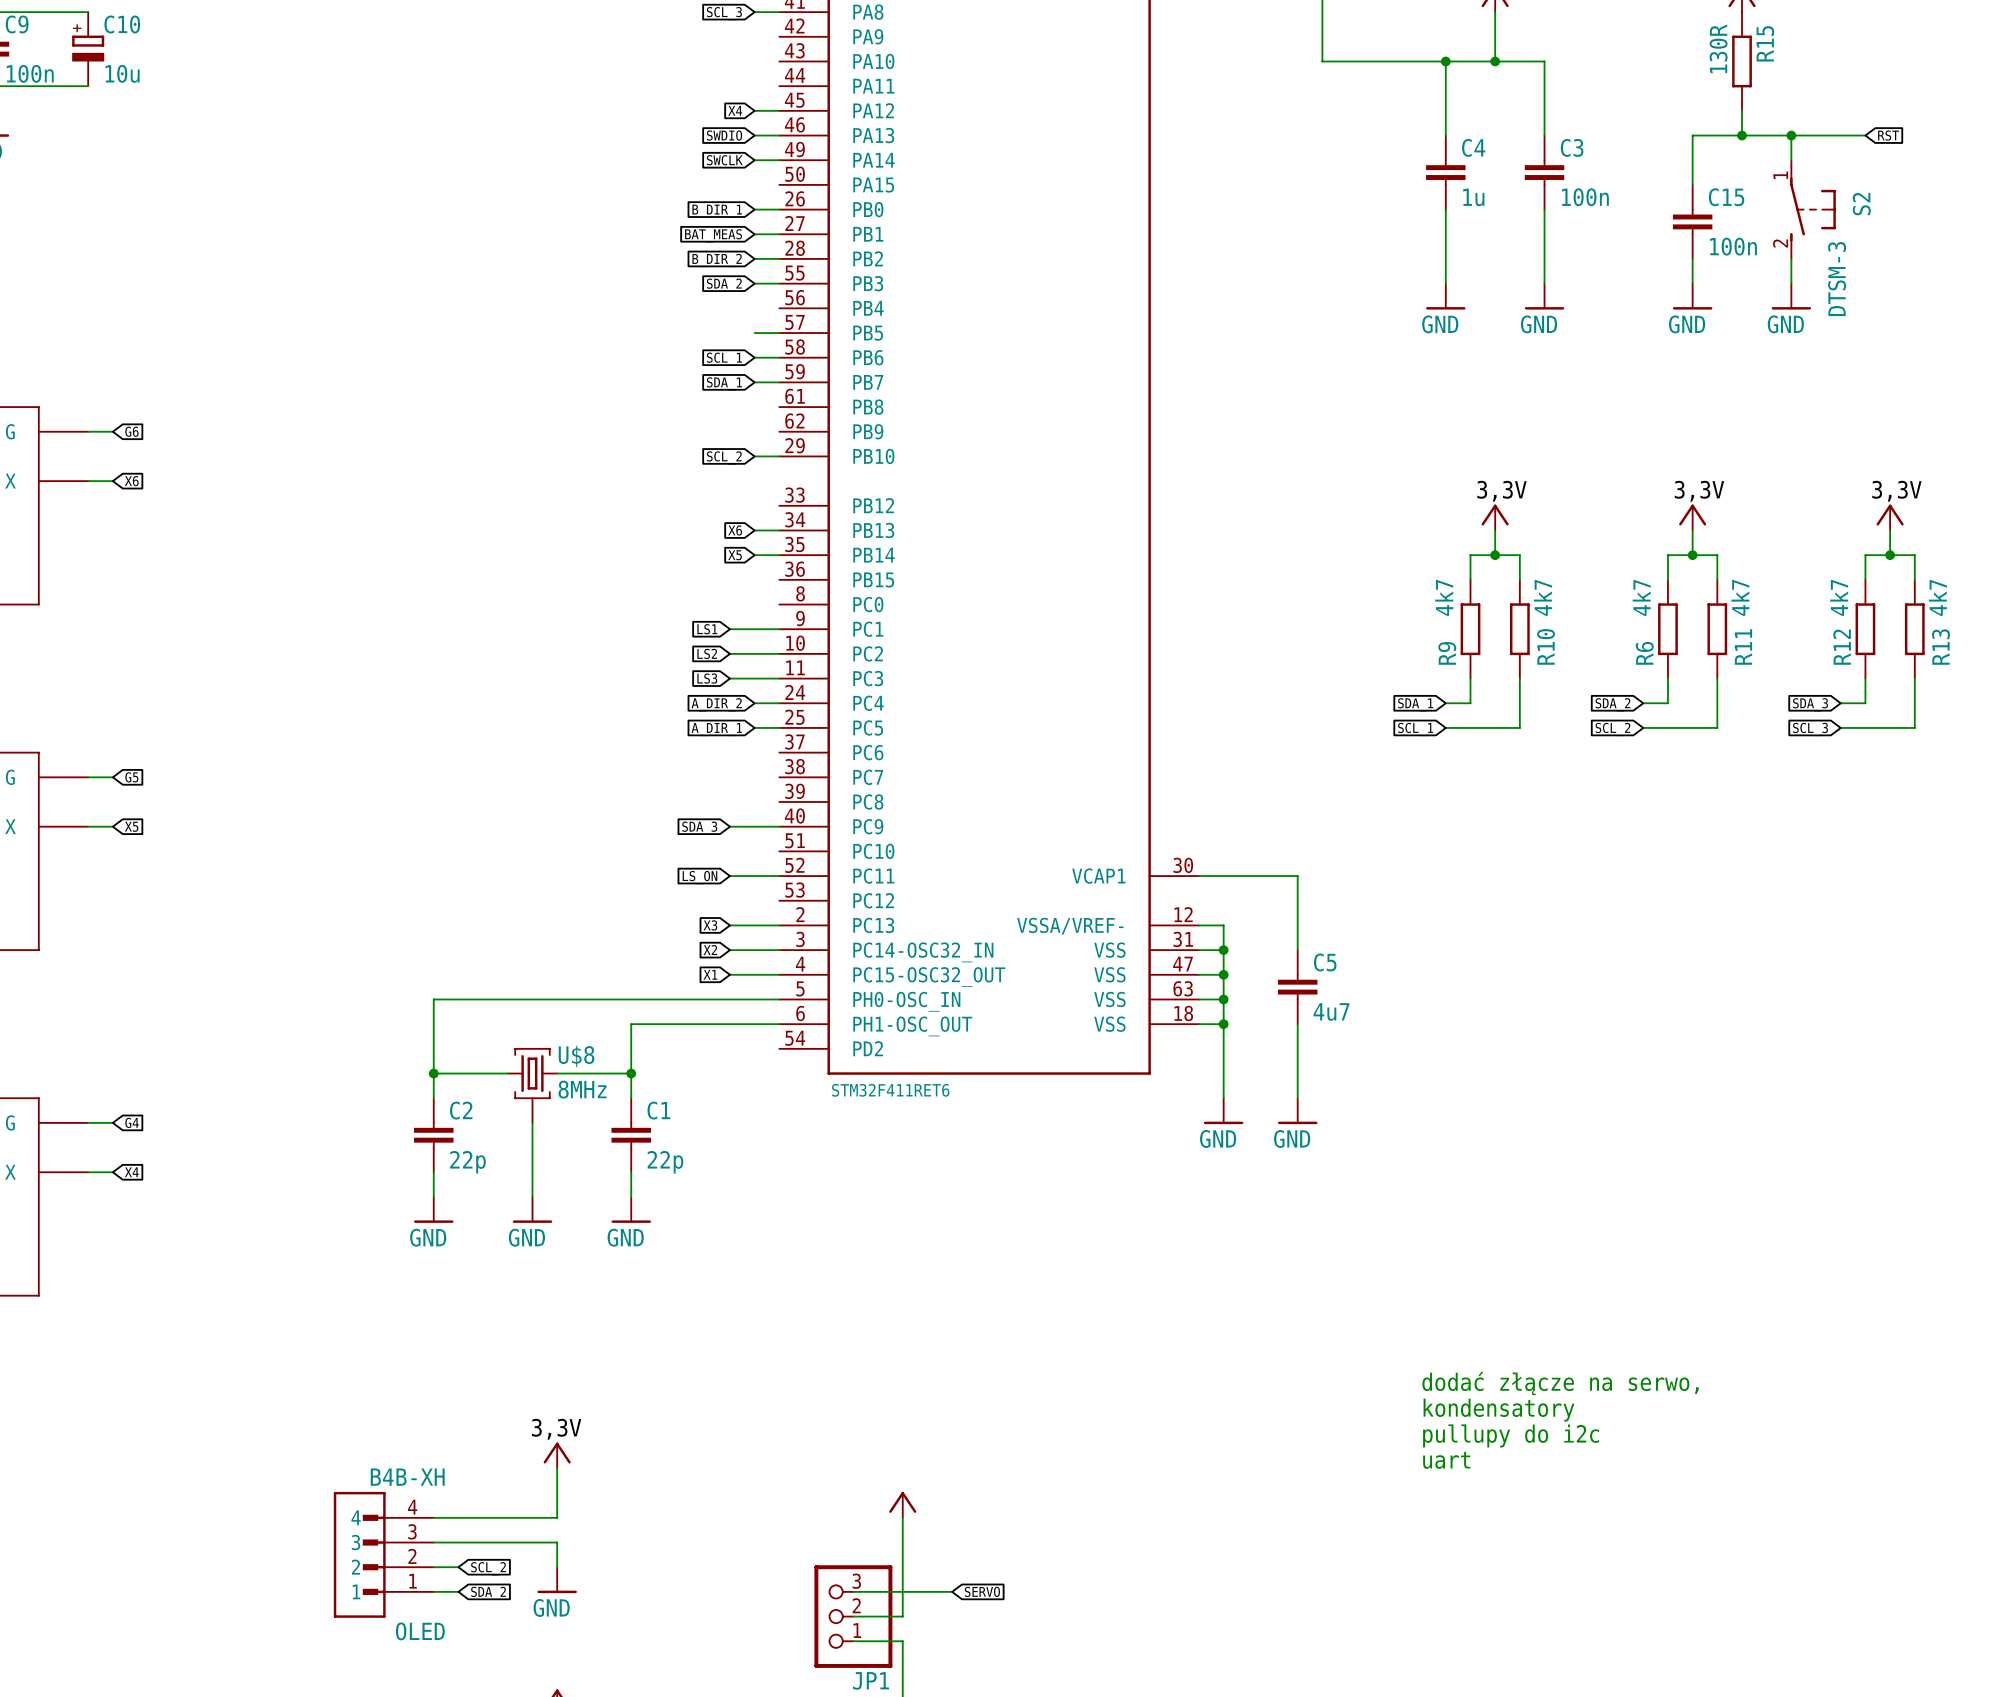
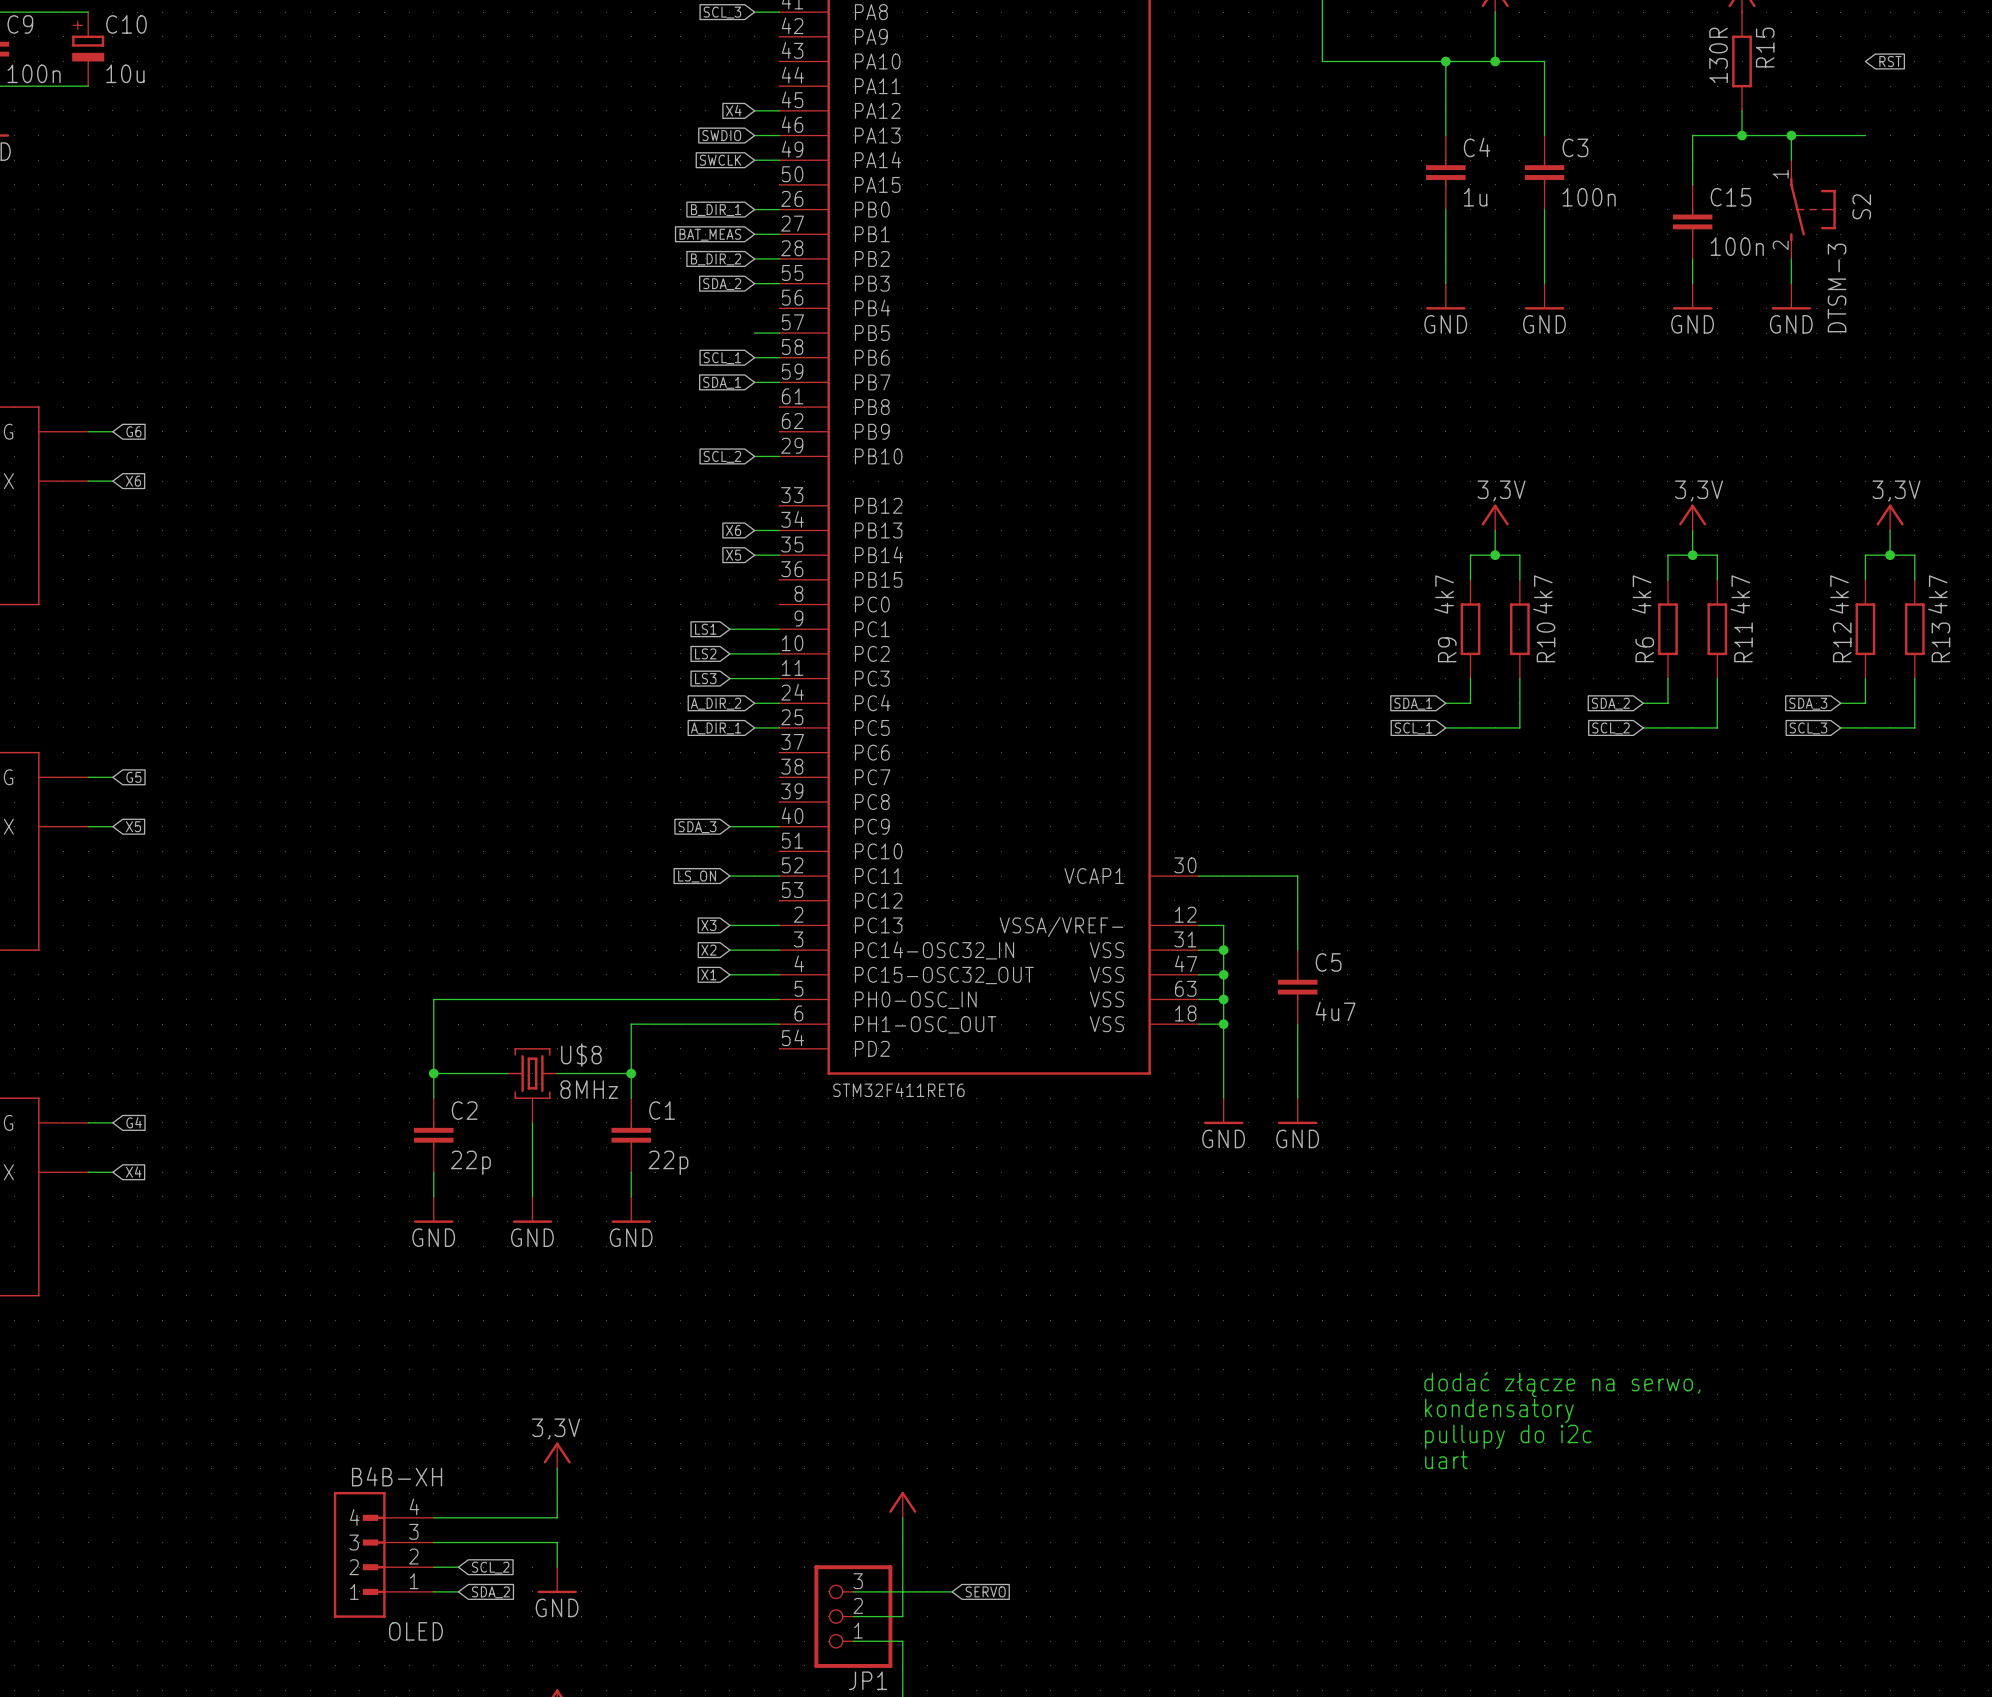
global label position: RST (1888, 135) -> RST (1890, 61)

